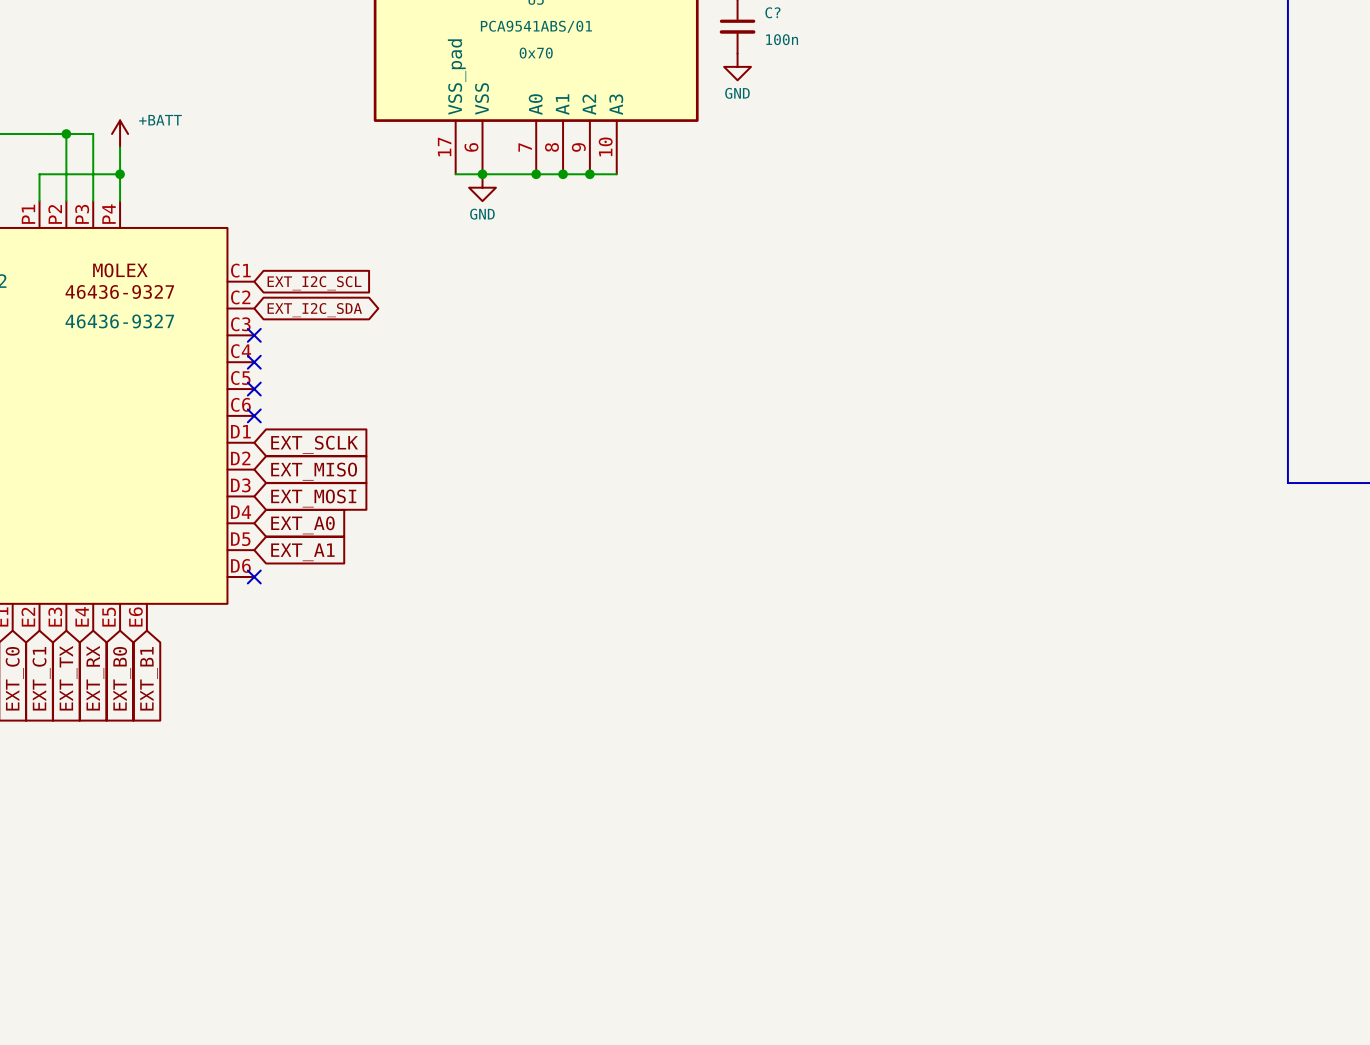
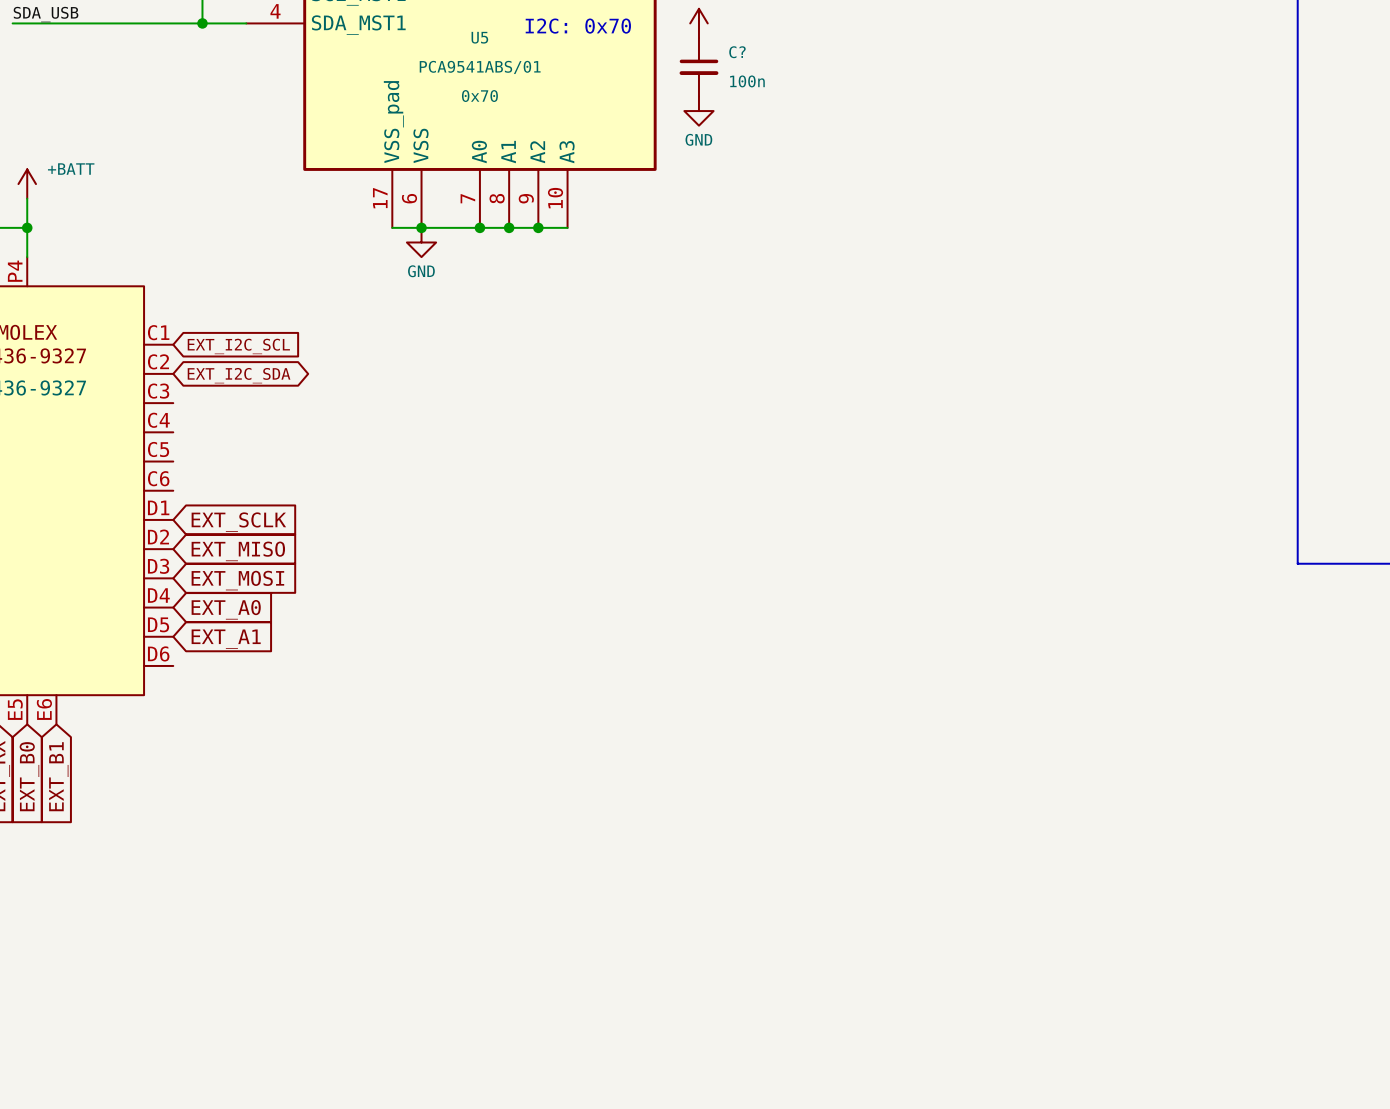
no-connect mark: (254, 335) -> none
no-connect mark: (254, 362) -> none
no-connect mark: (254, 389) -> none
no-connect mark: (254, 415) -> none
no-connect mark: (254, 576) -> none

